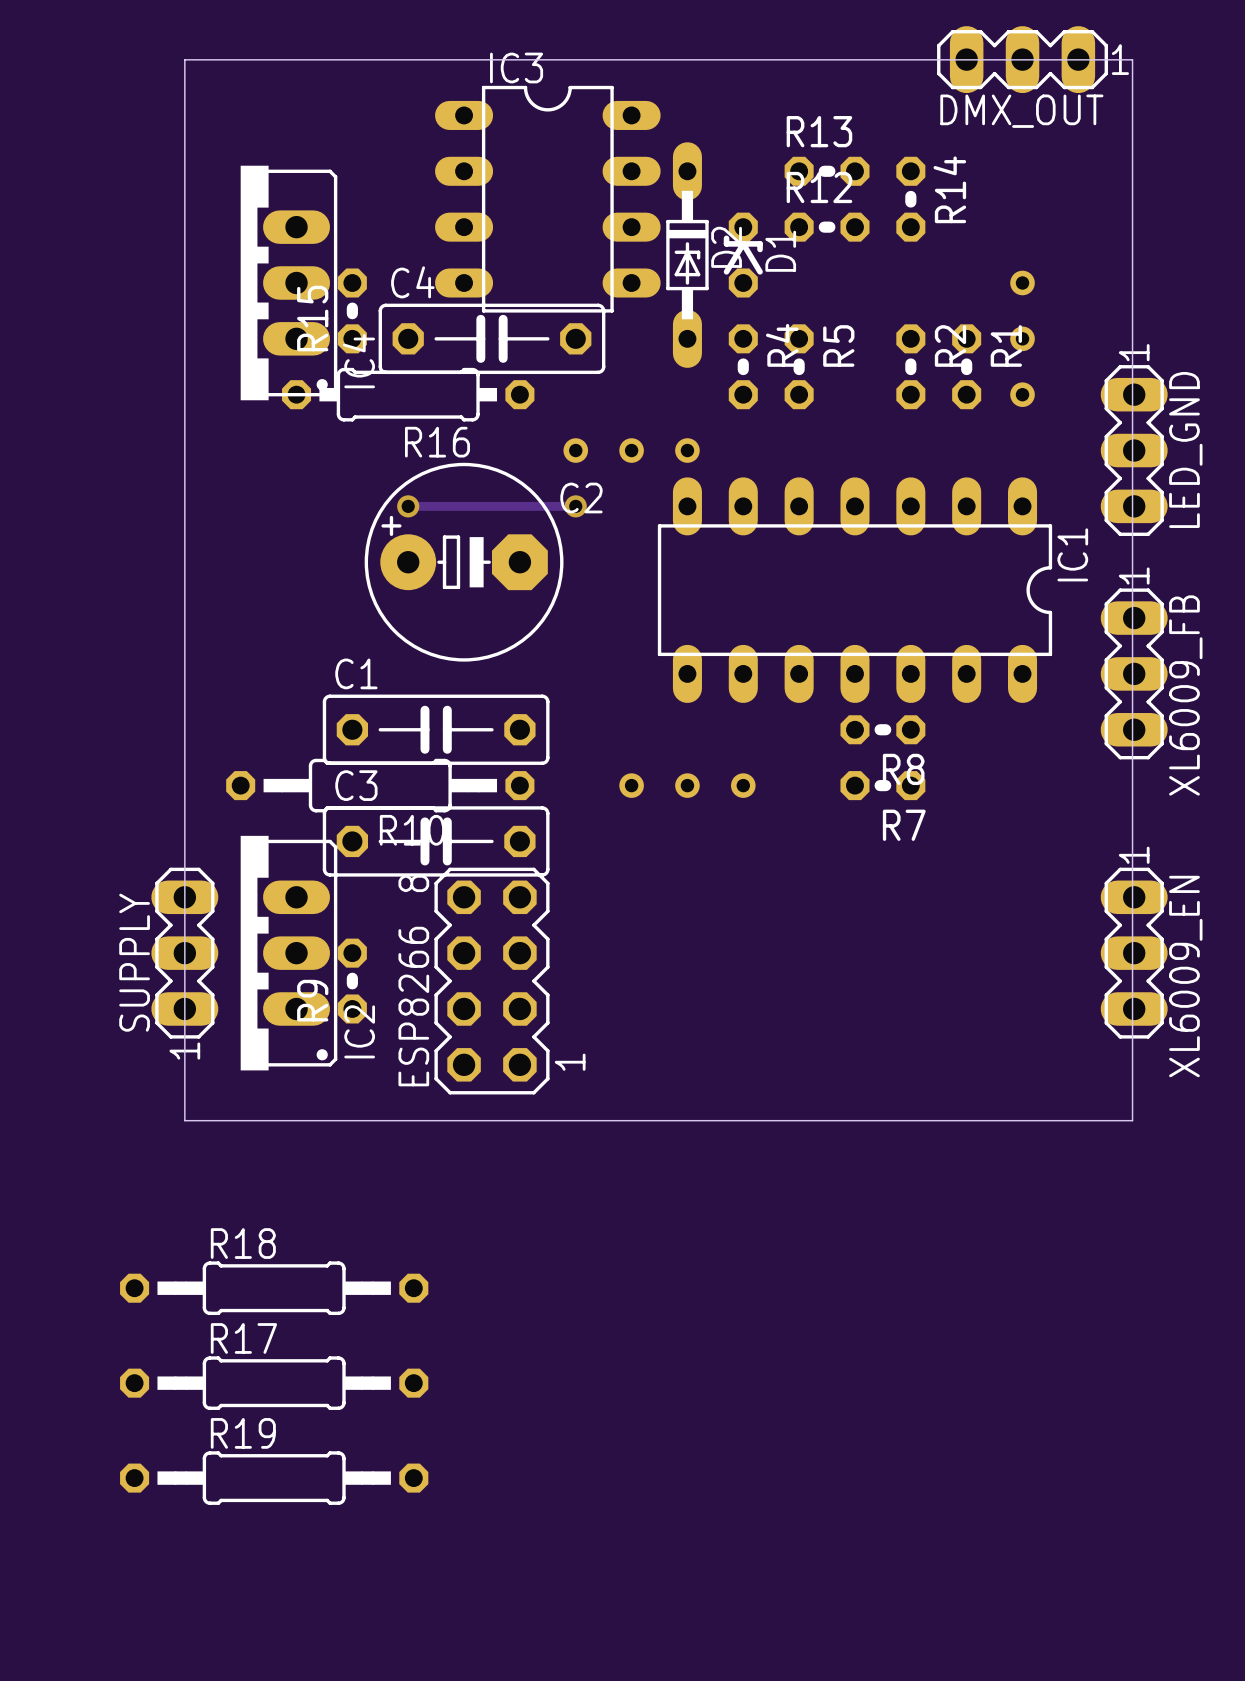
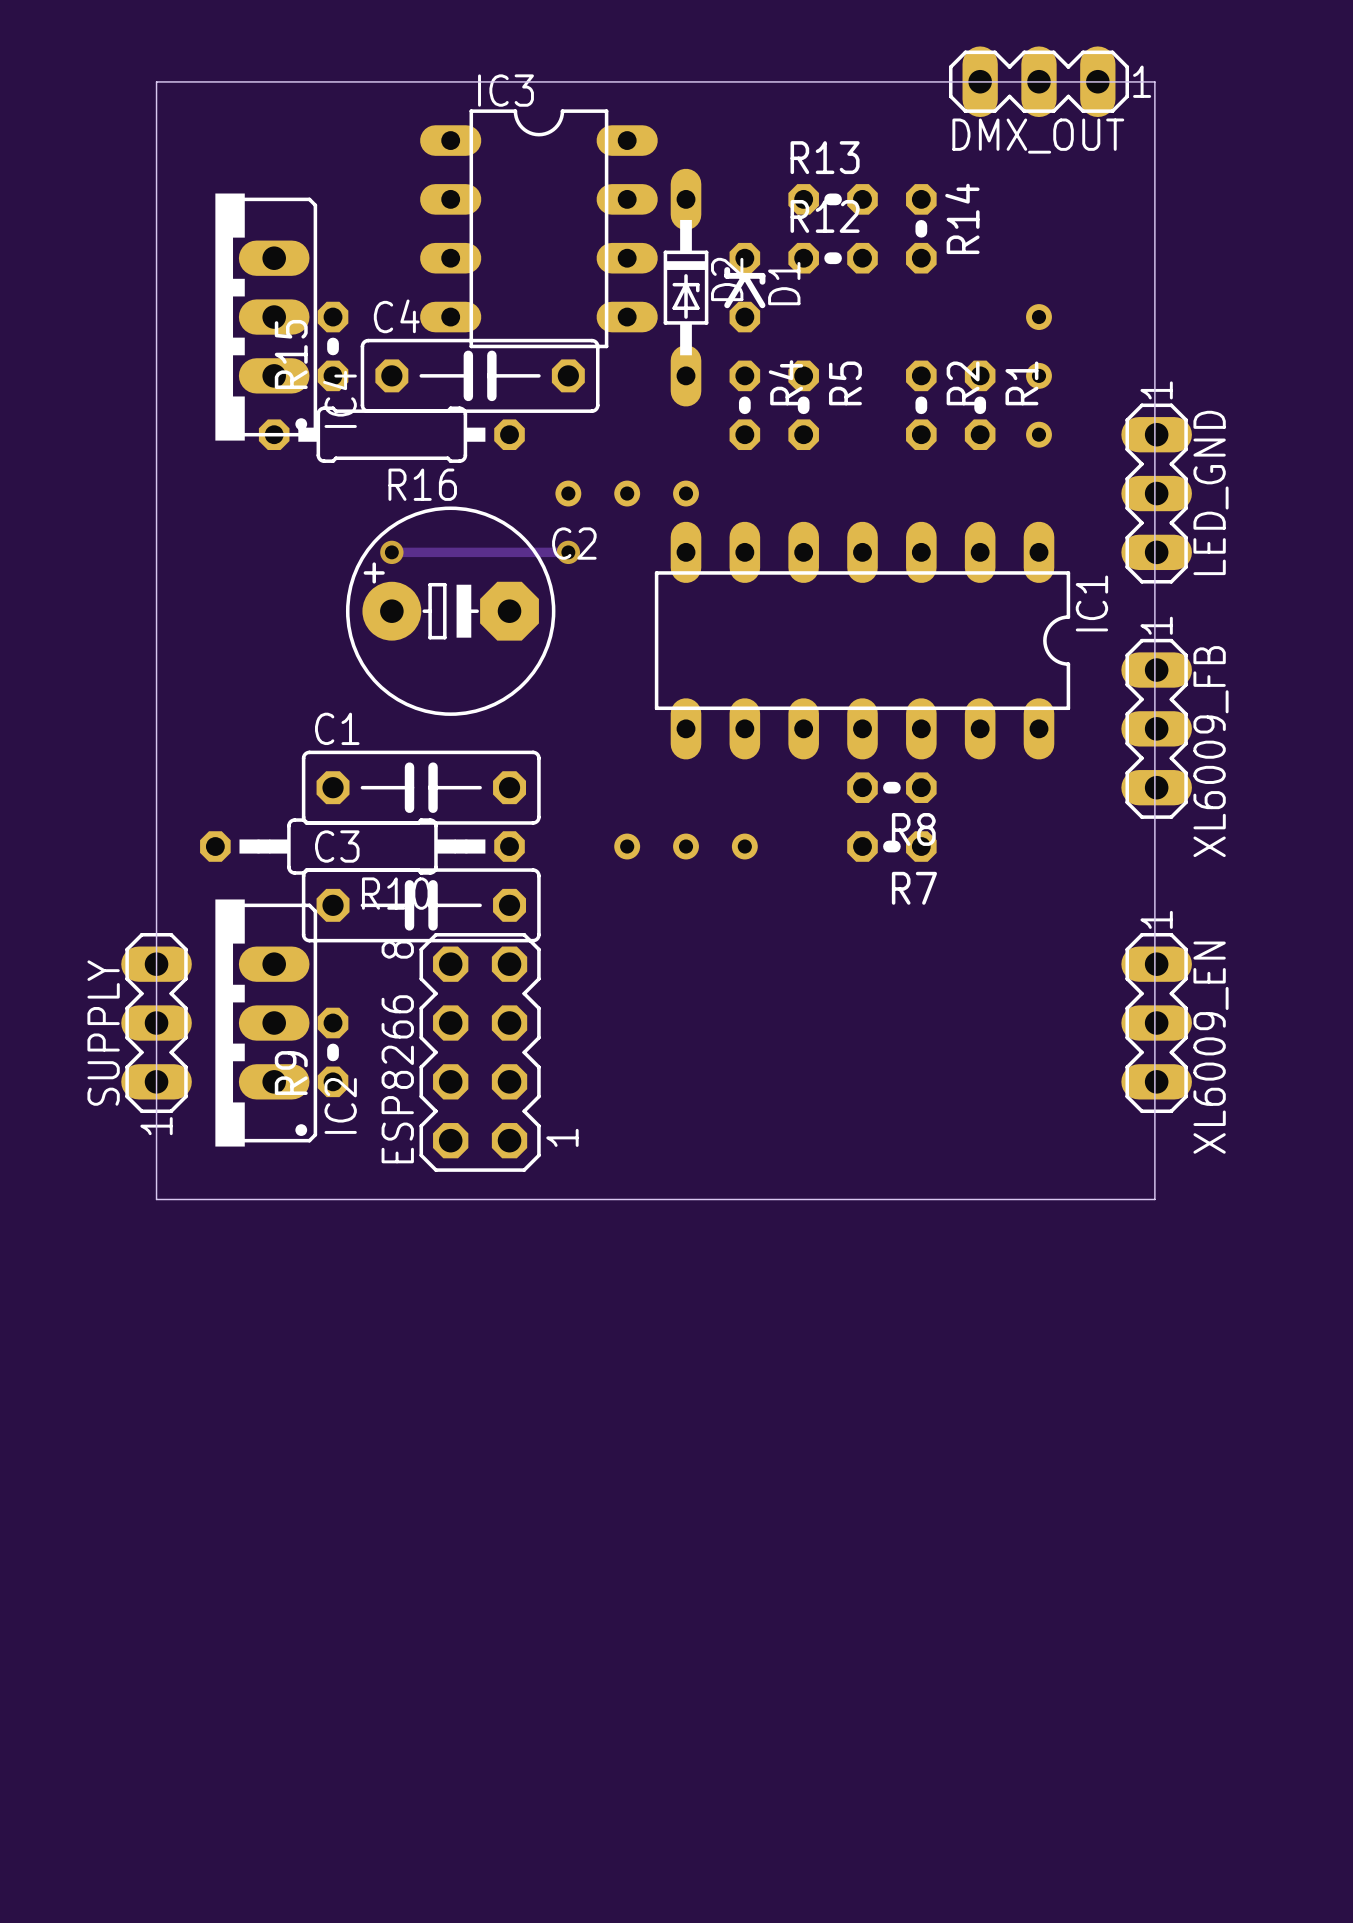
R18: (274, 1288) -> none
R17: (274, 1383) -> none
R19: (274, 1478) -> none

